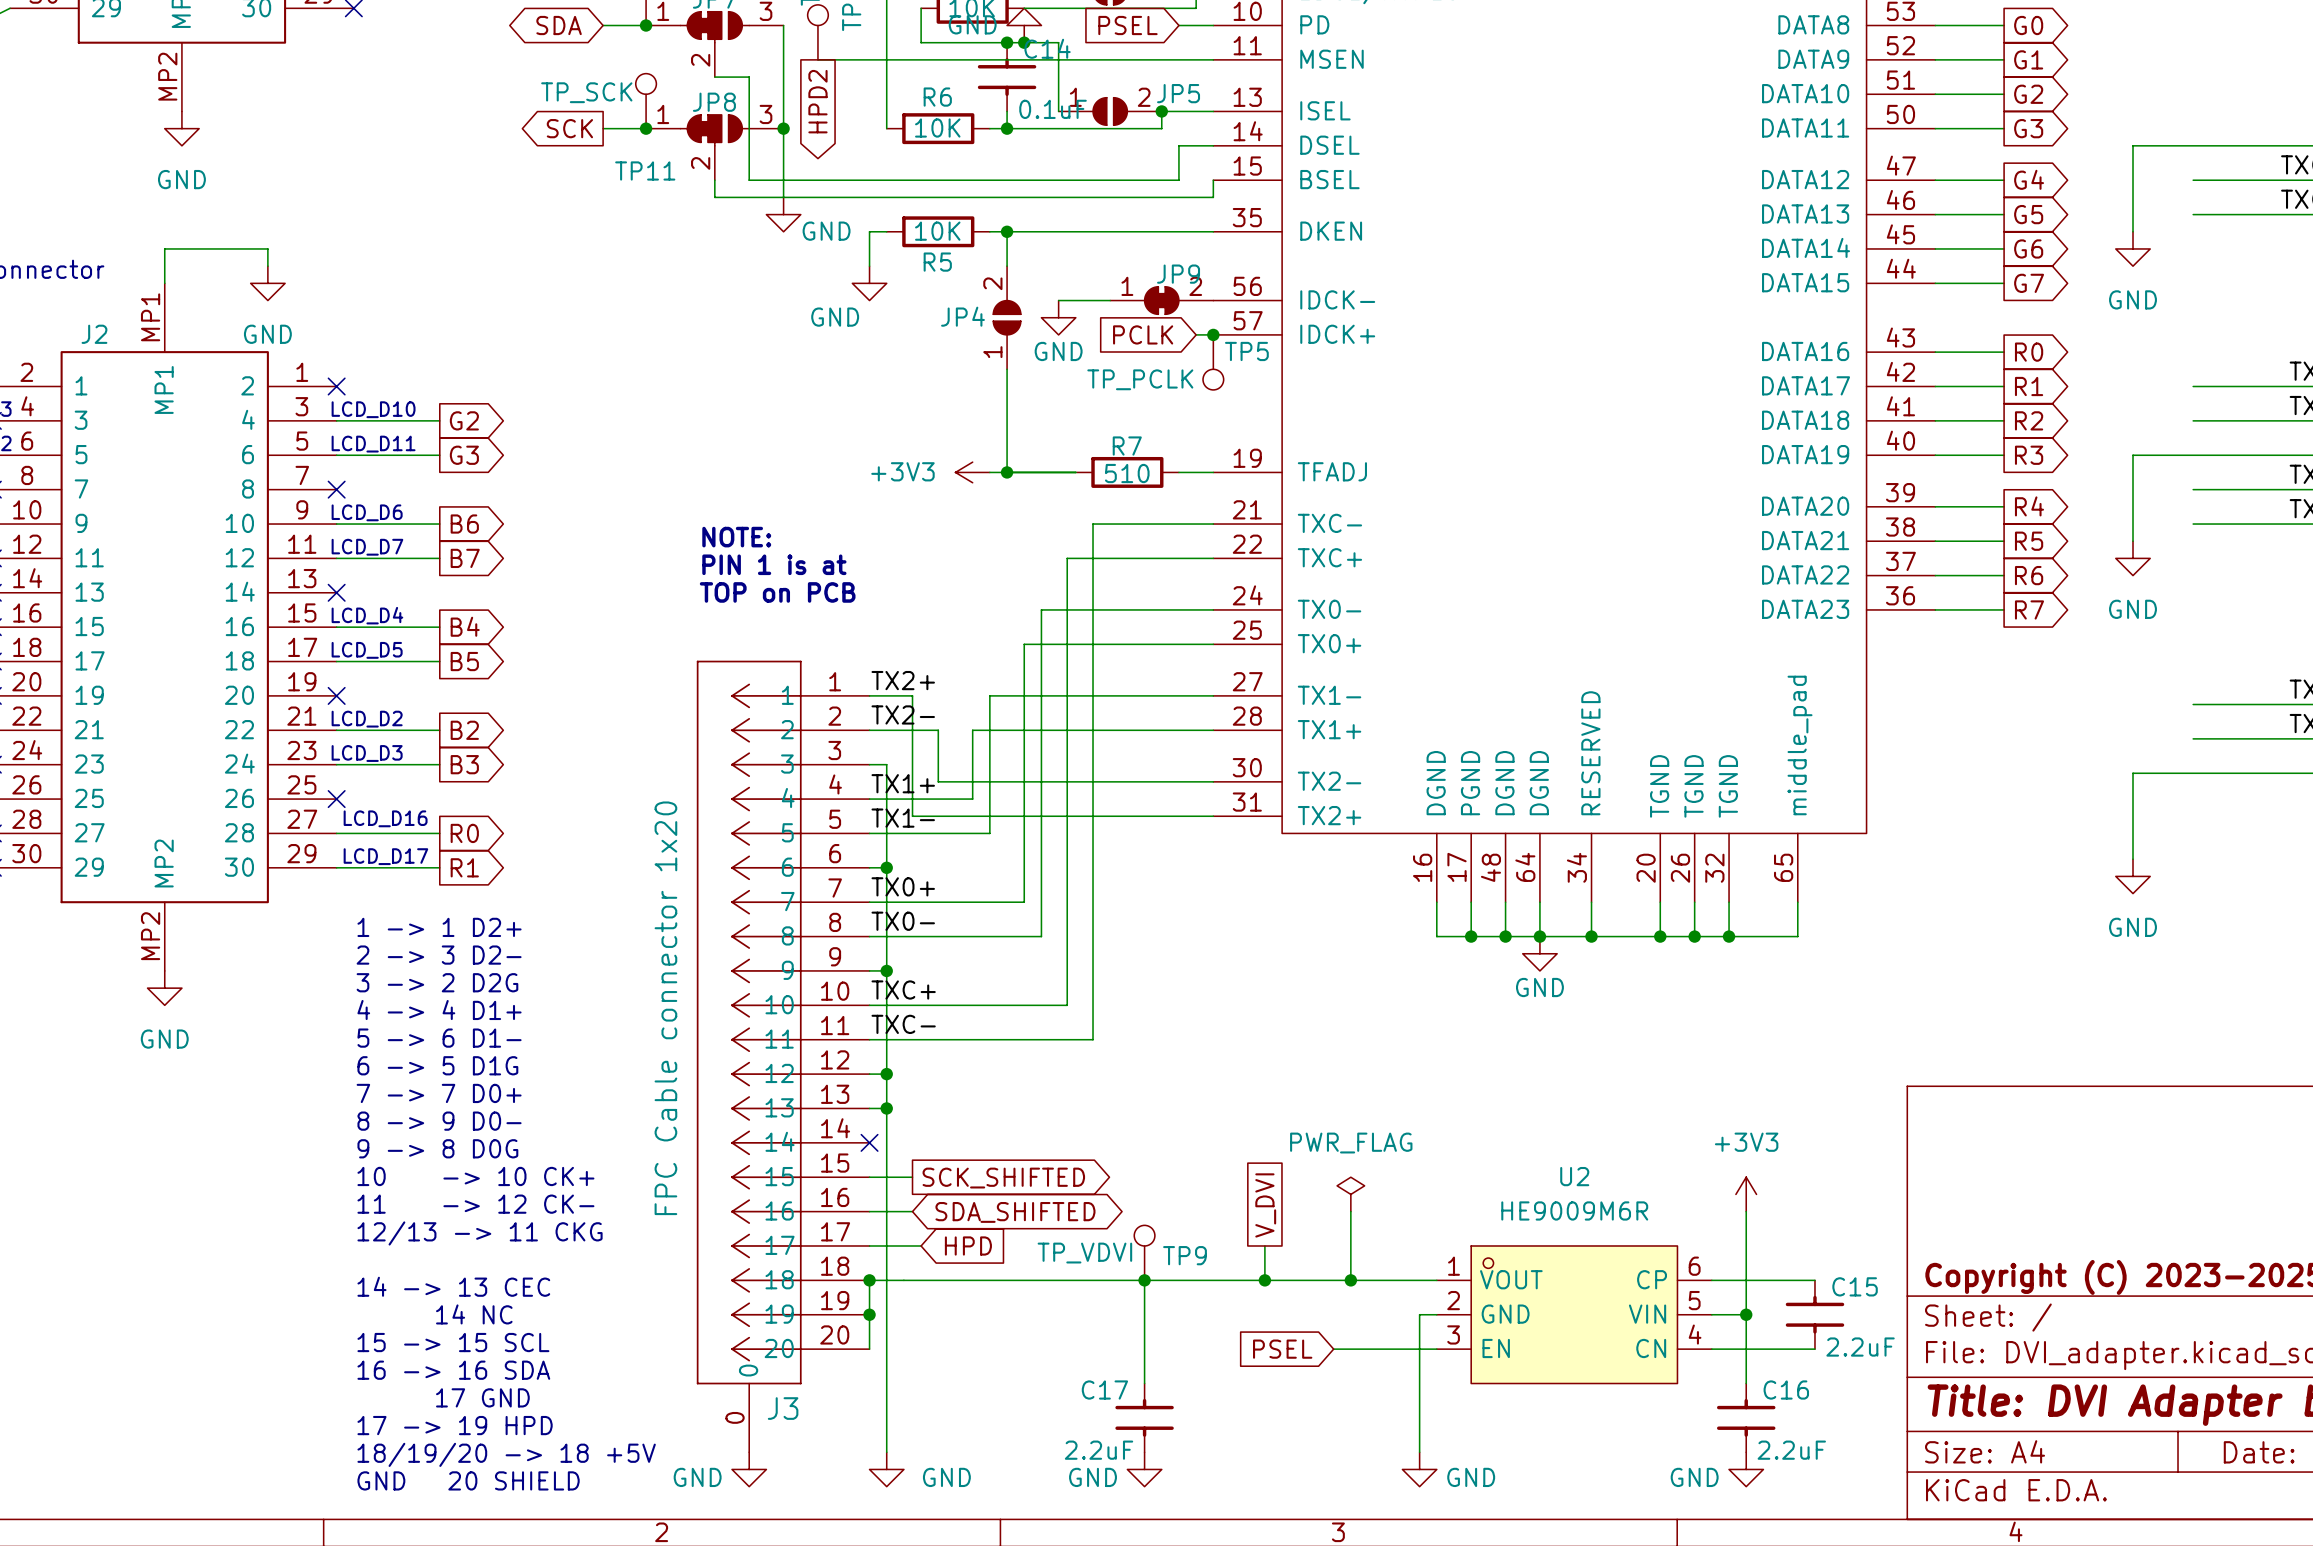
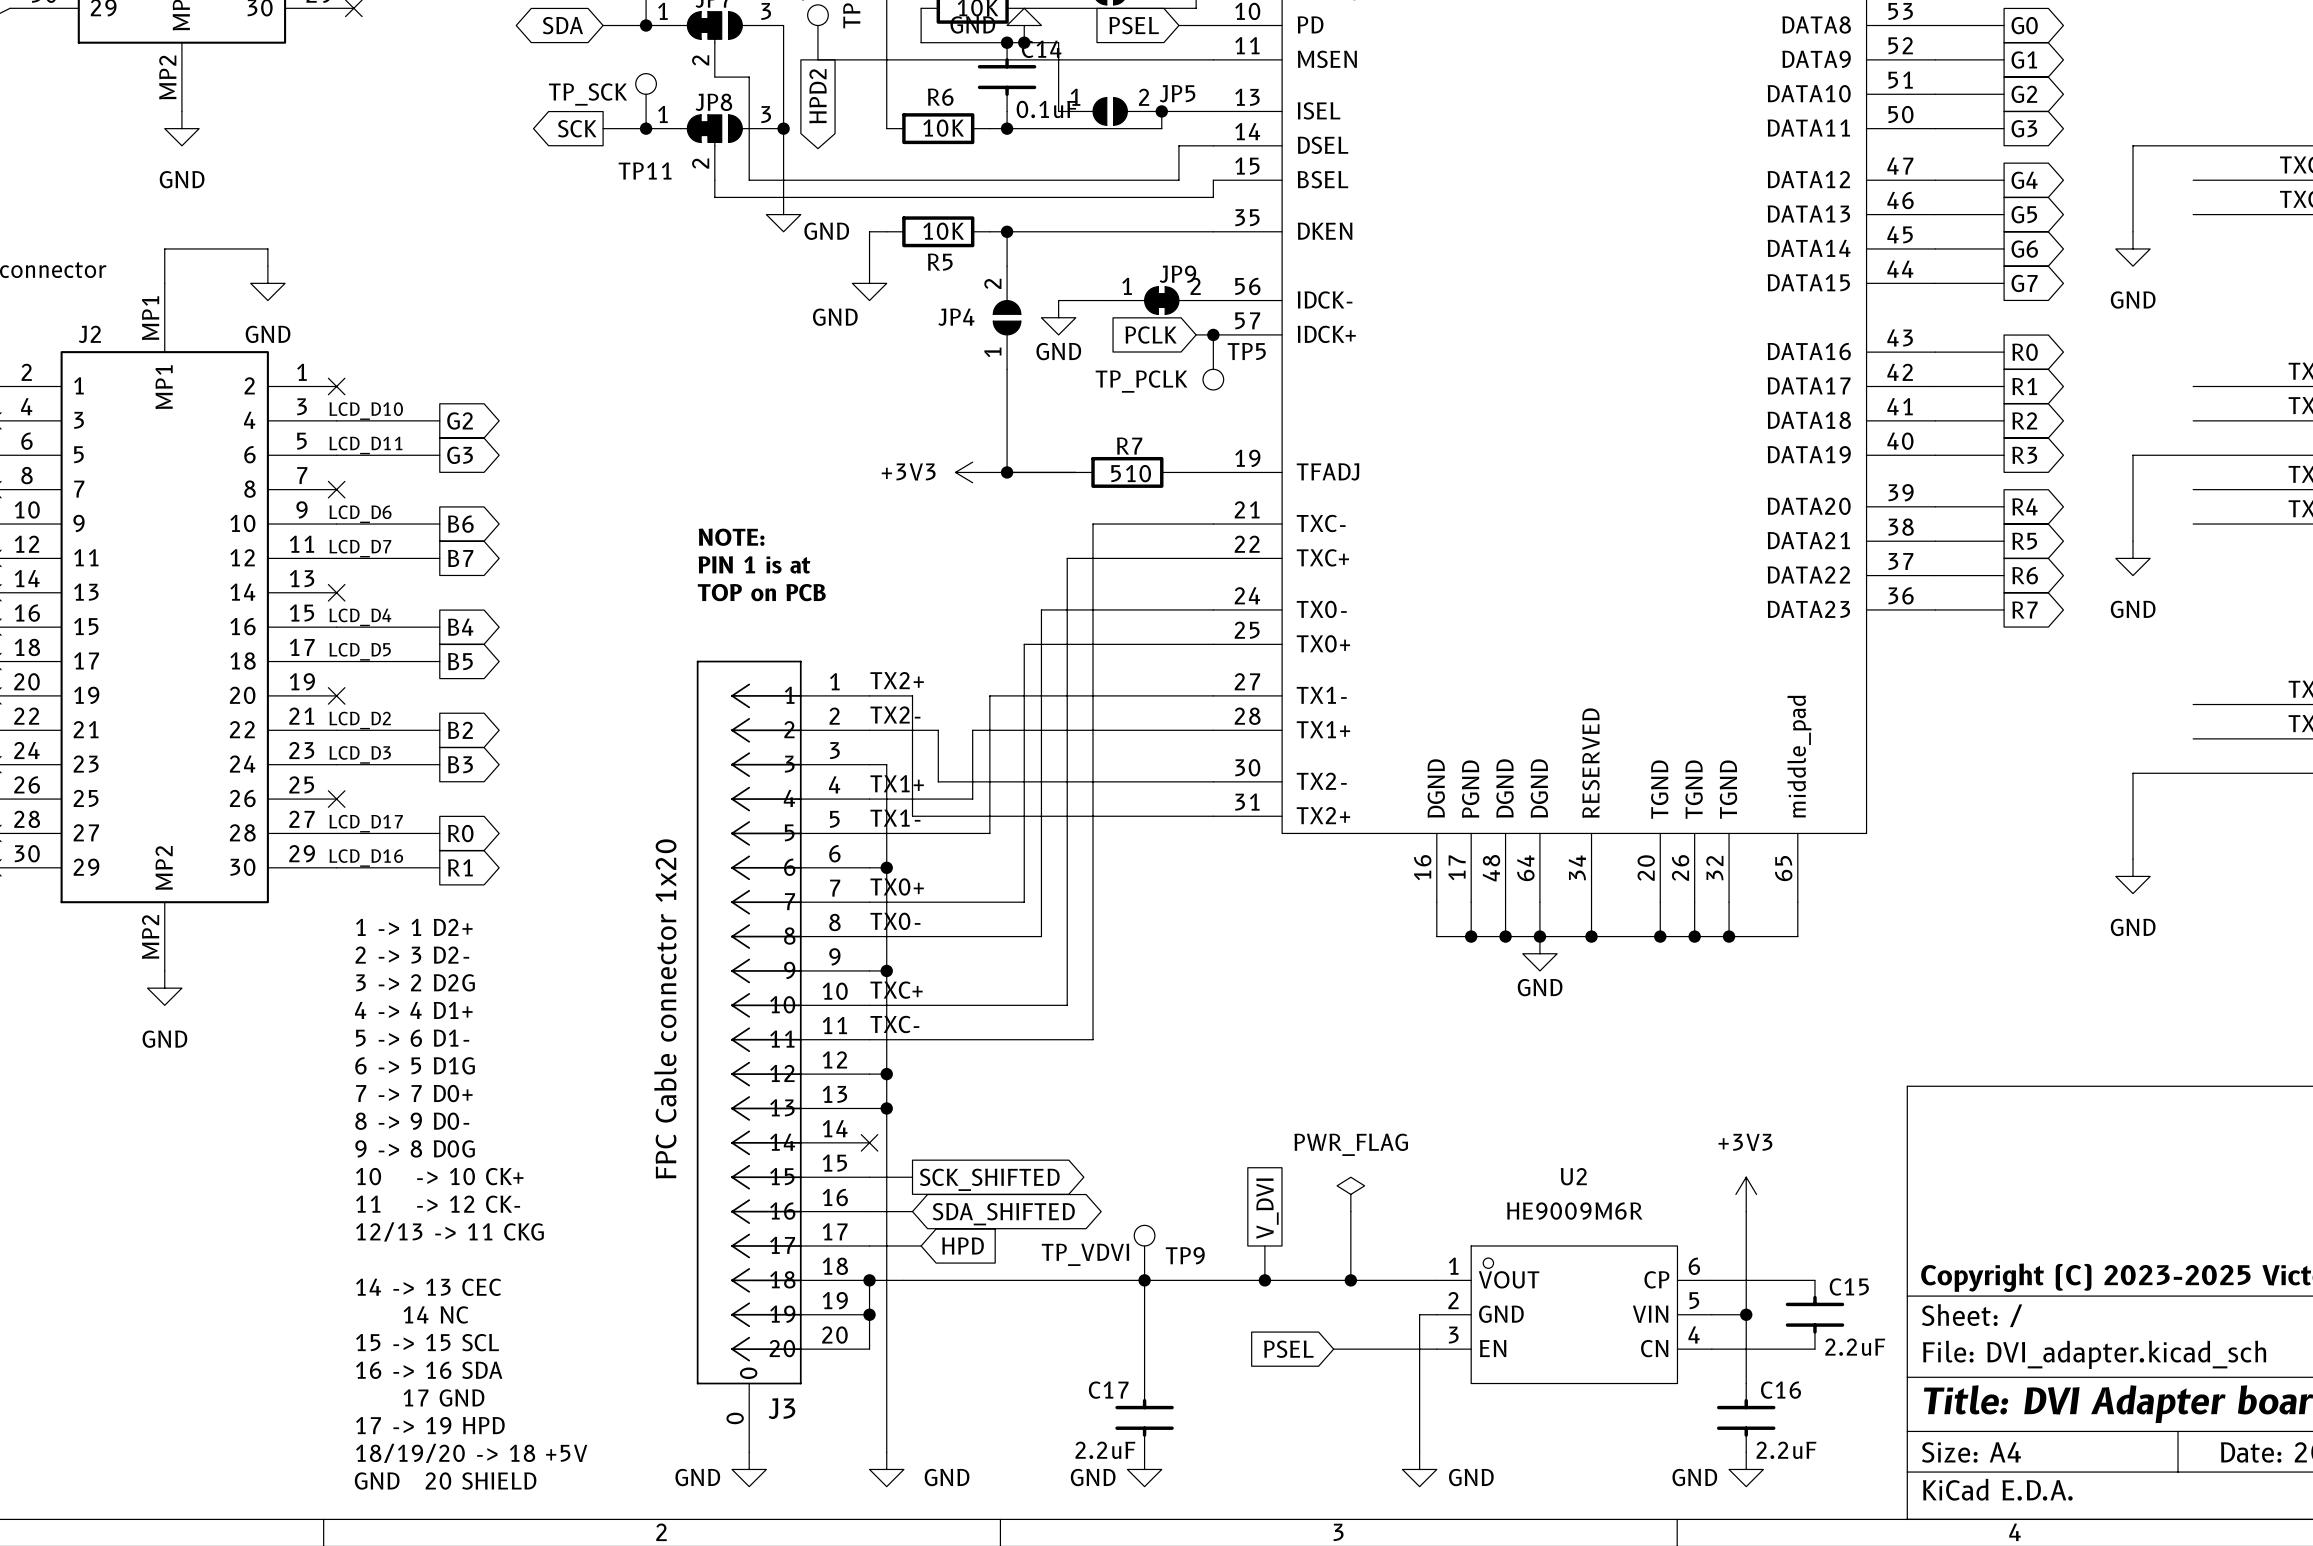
text position: LCD_D16 (385, 818) -> LCD_D16 (366, 858)
text position: LCD_D17 (385, 856) -> LCD_D17 (366, 823)

